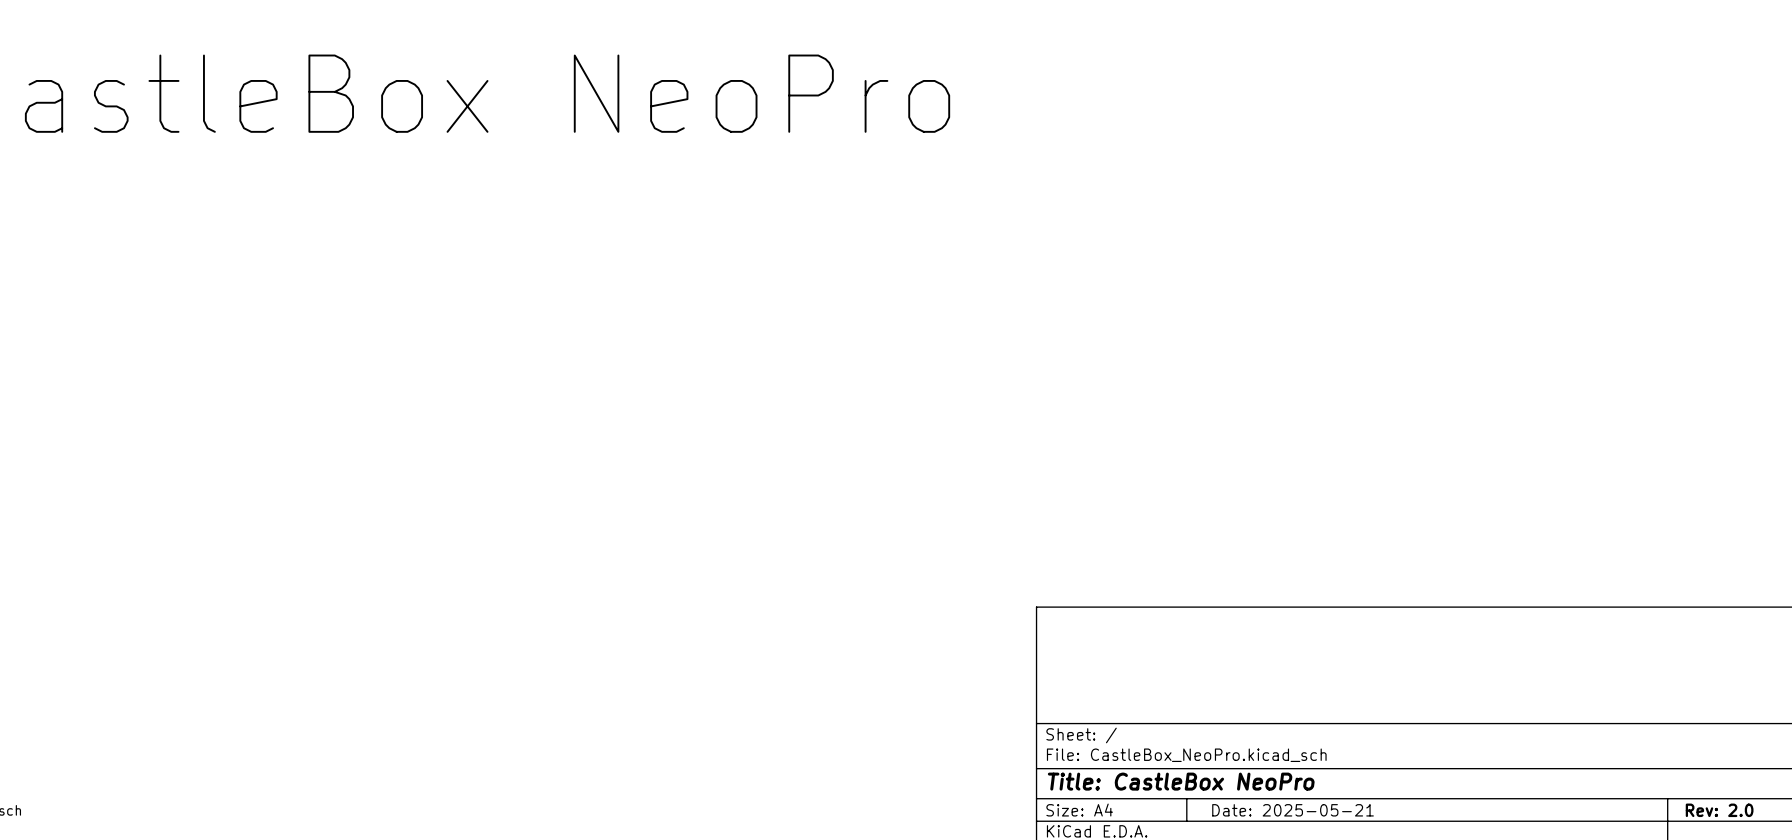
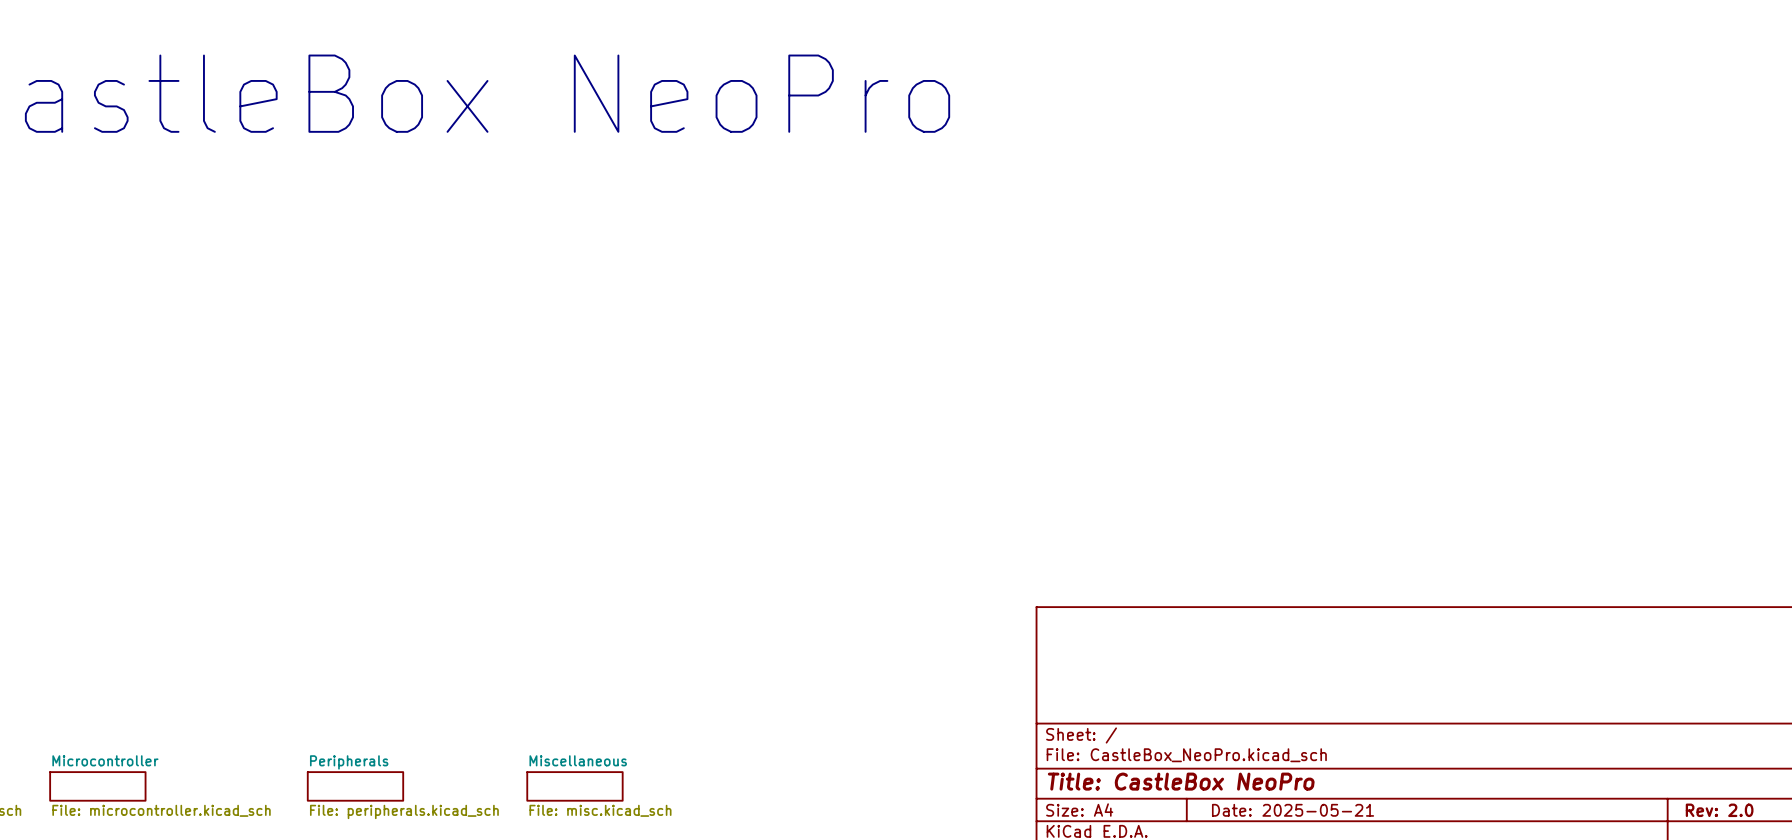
sheet Microcontroller: none -> File: microcontroller.kicad_sch (97, 786)
sheet Peripherals: none -> File: peripherals.kicad_sch (355, 786)
sheet Miscellaneous: none -> File: misc.kicad_sch (574, 786)

